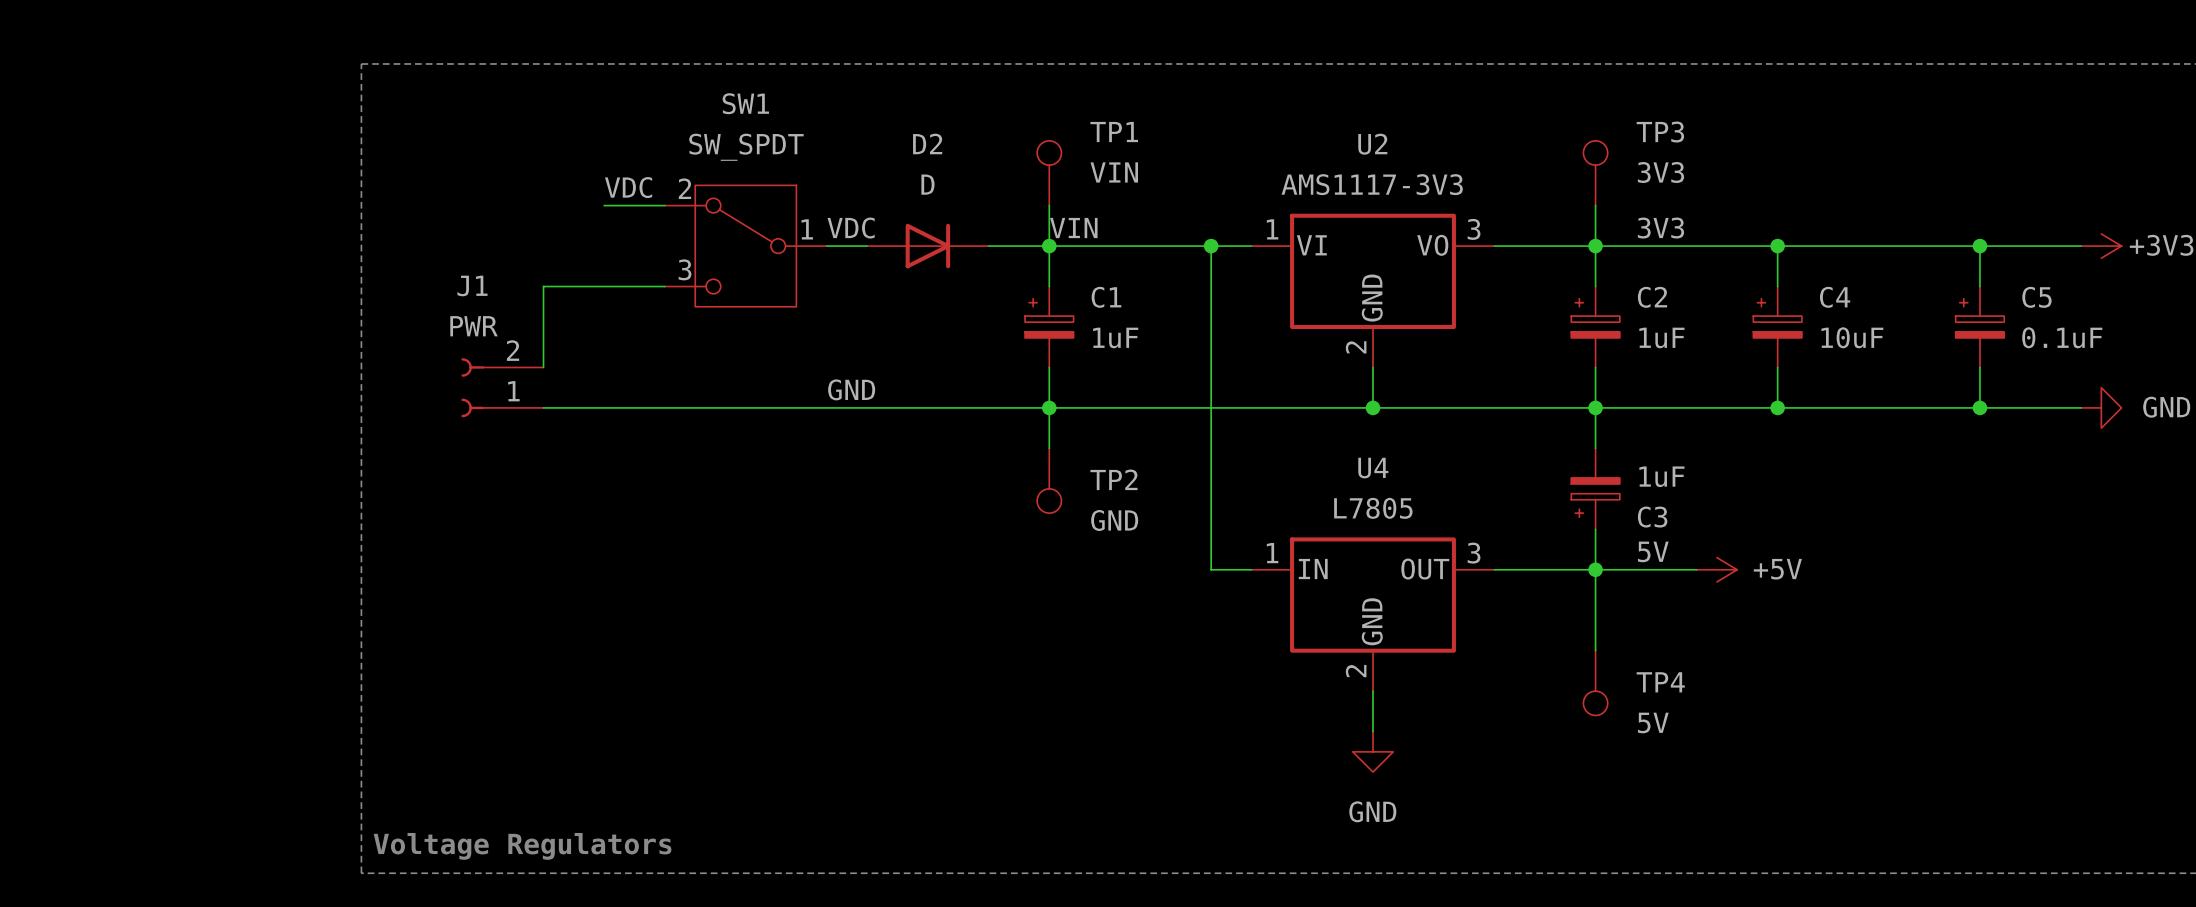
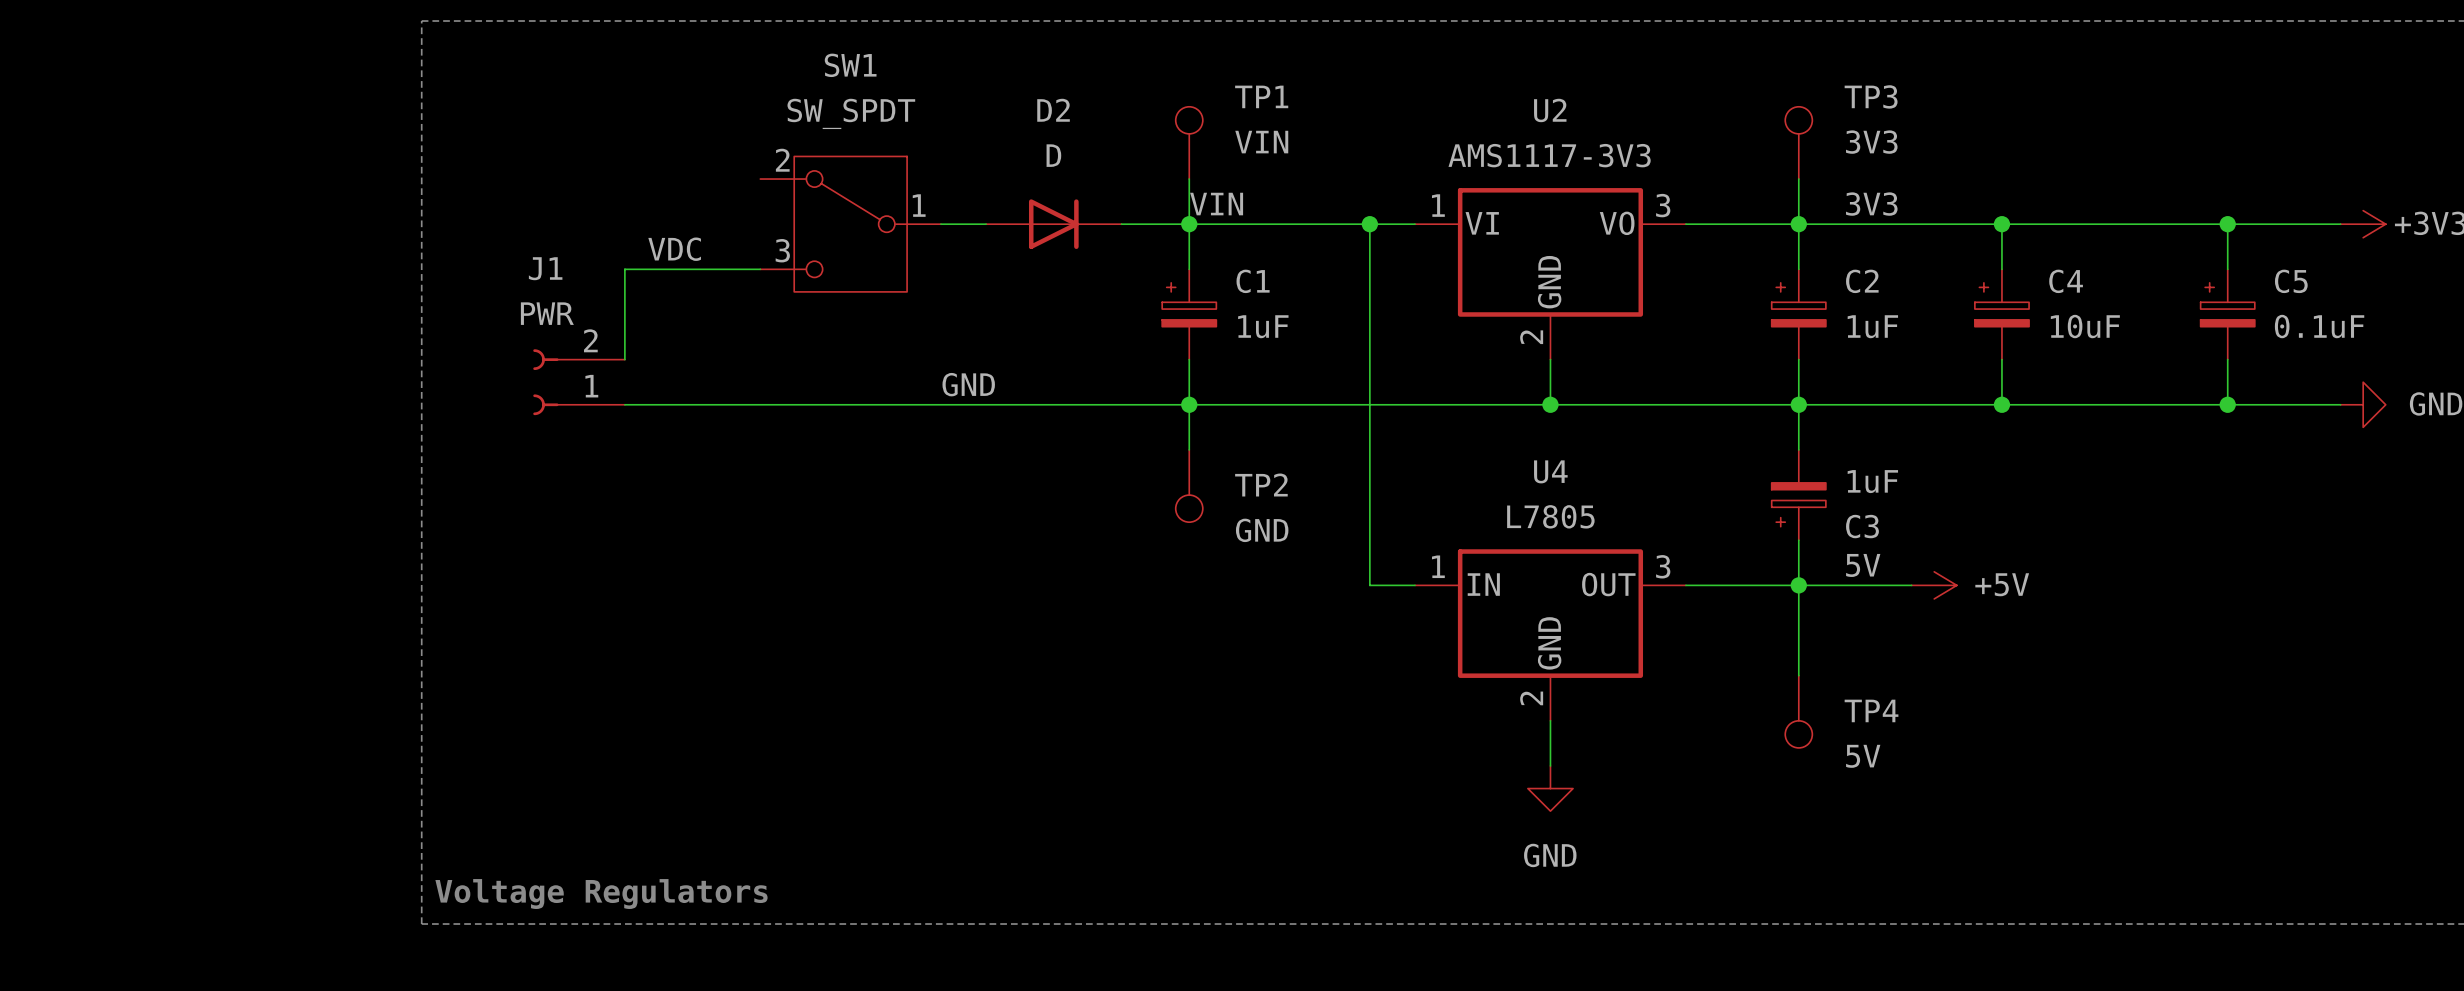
label position: VDC (628, 187) -> VDC (674, 249)
wire: (604, 205) (664, 205) -> none
label: VDC (851, 228) -> none

